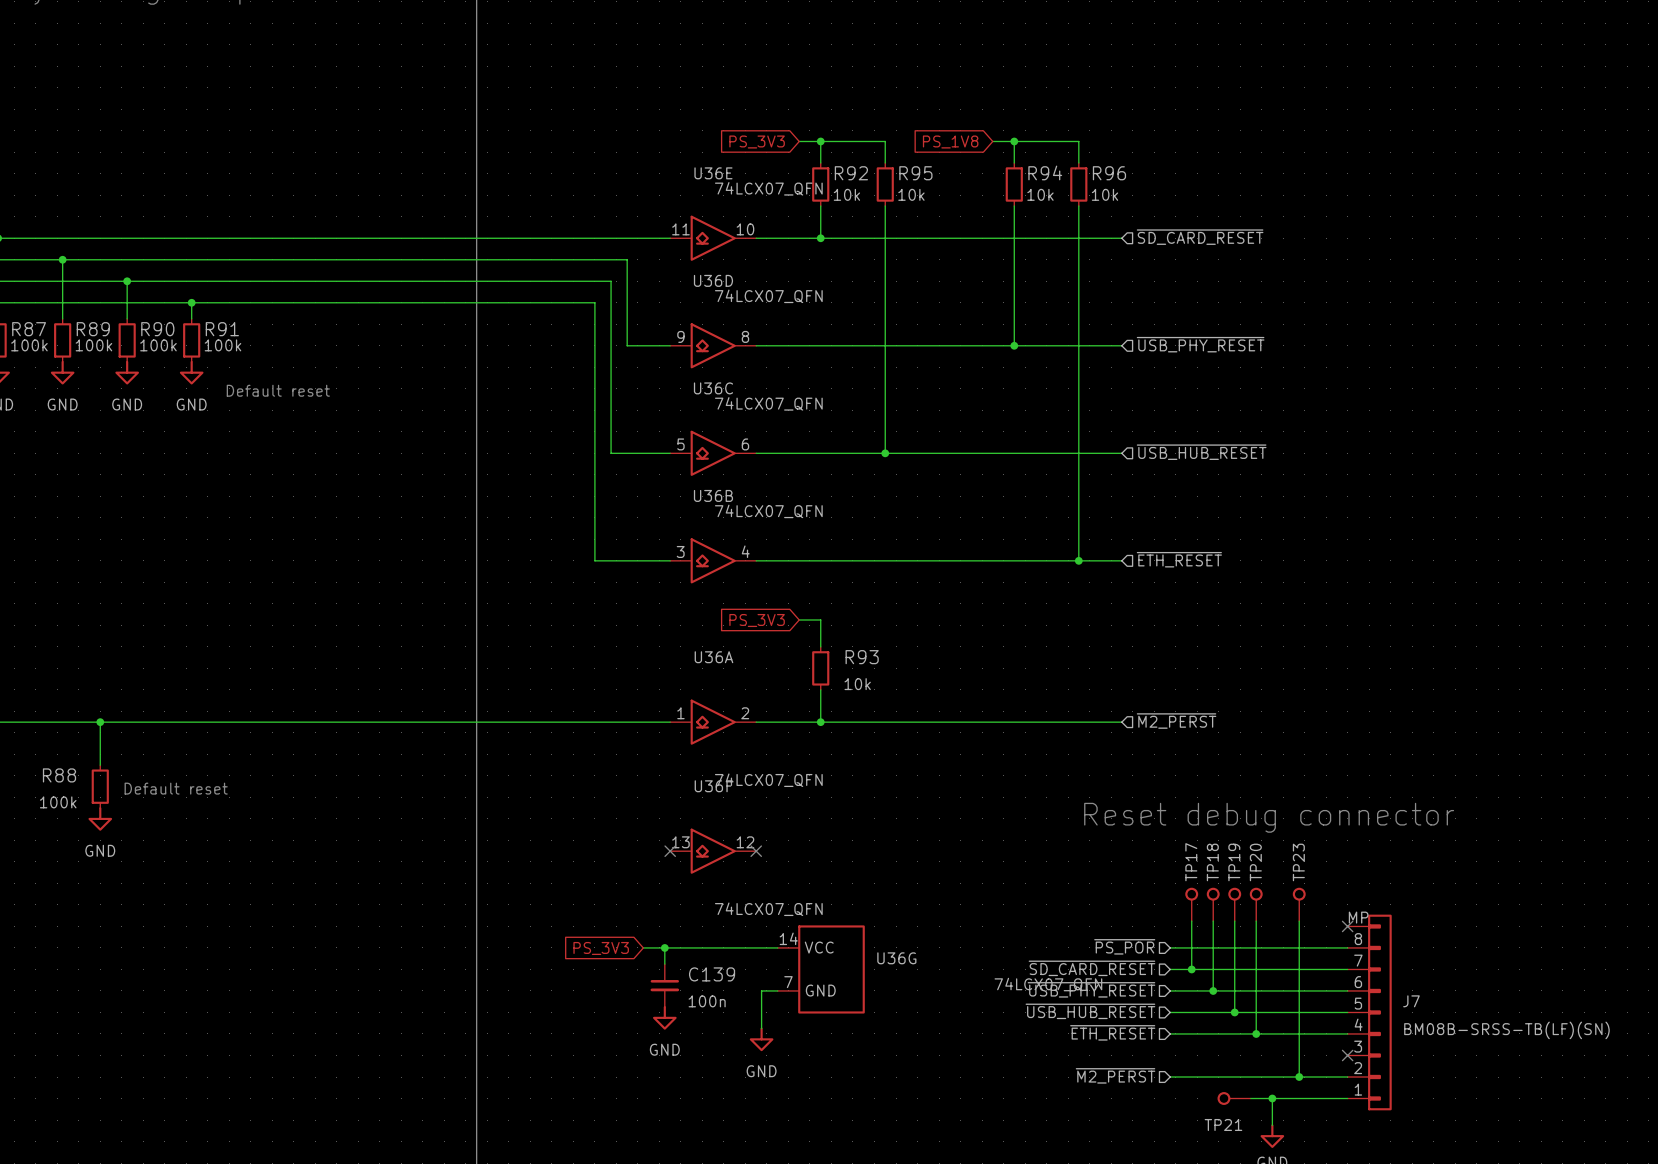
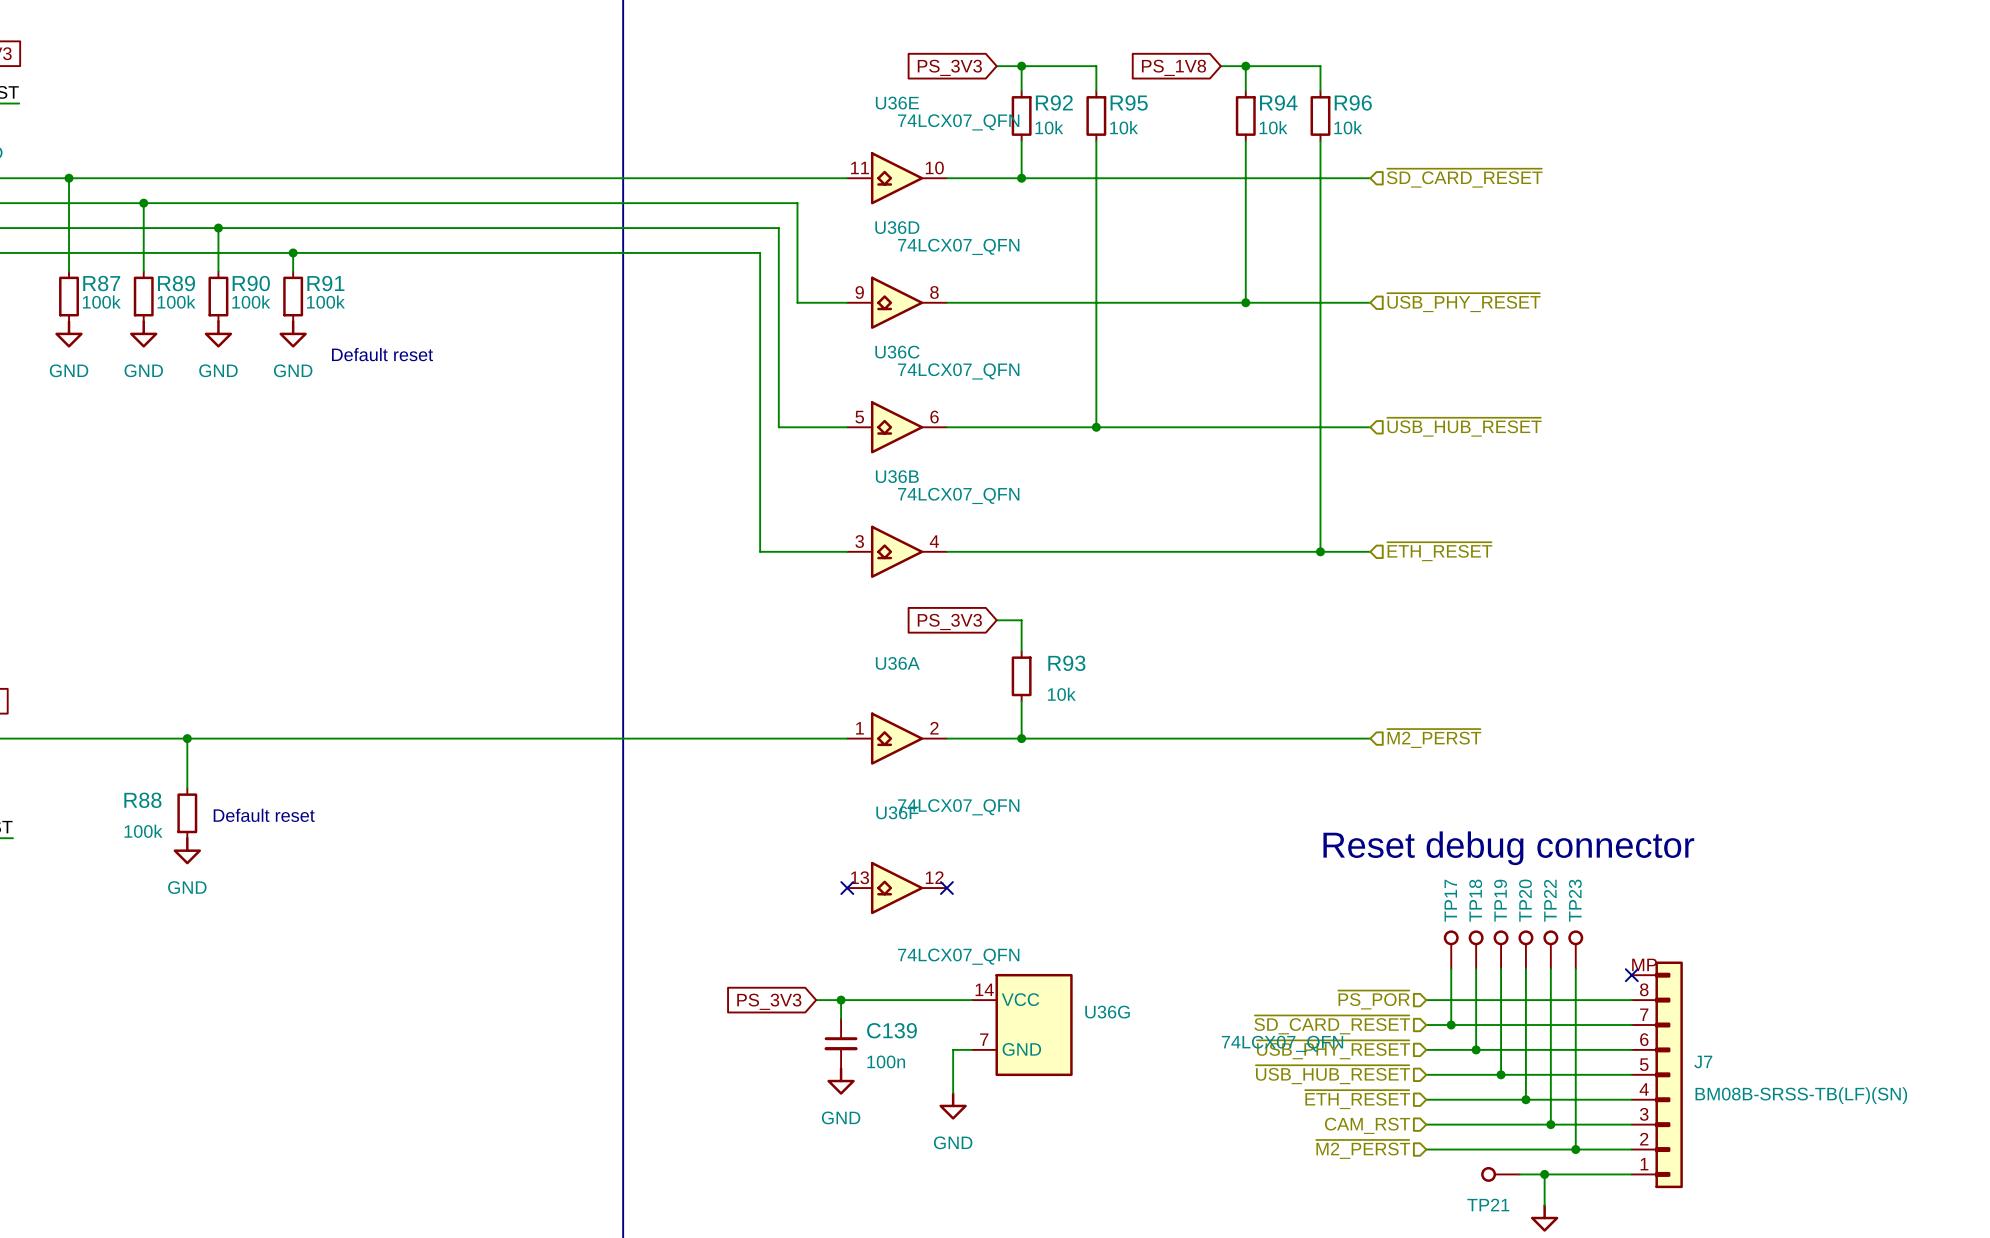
TP22: none -> (1550, 949)
wire: none -> (1550, 968) (1550, 1124)
hierarchical label: none -> CAM_RST (1367, 1125)
wire: none -> (1426, 1124) (1631, 1124)
junction: none -> (1550, 1124)
no-connect mark: (1347, 1055) -> none

